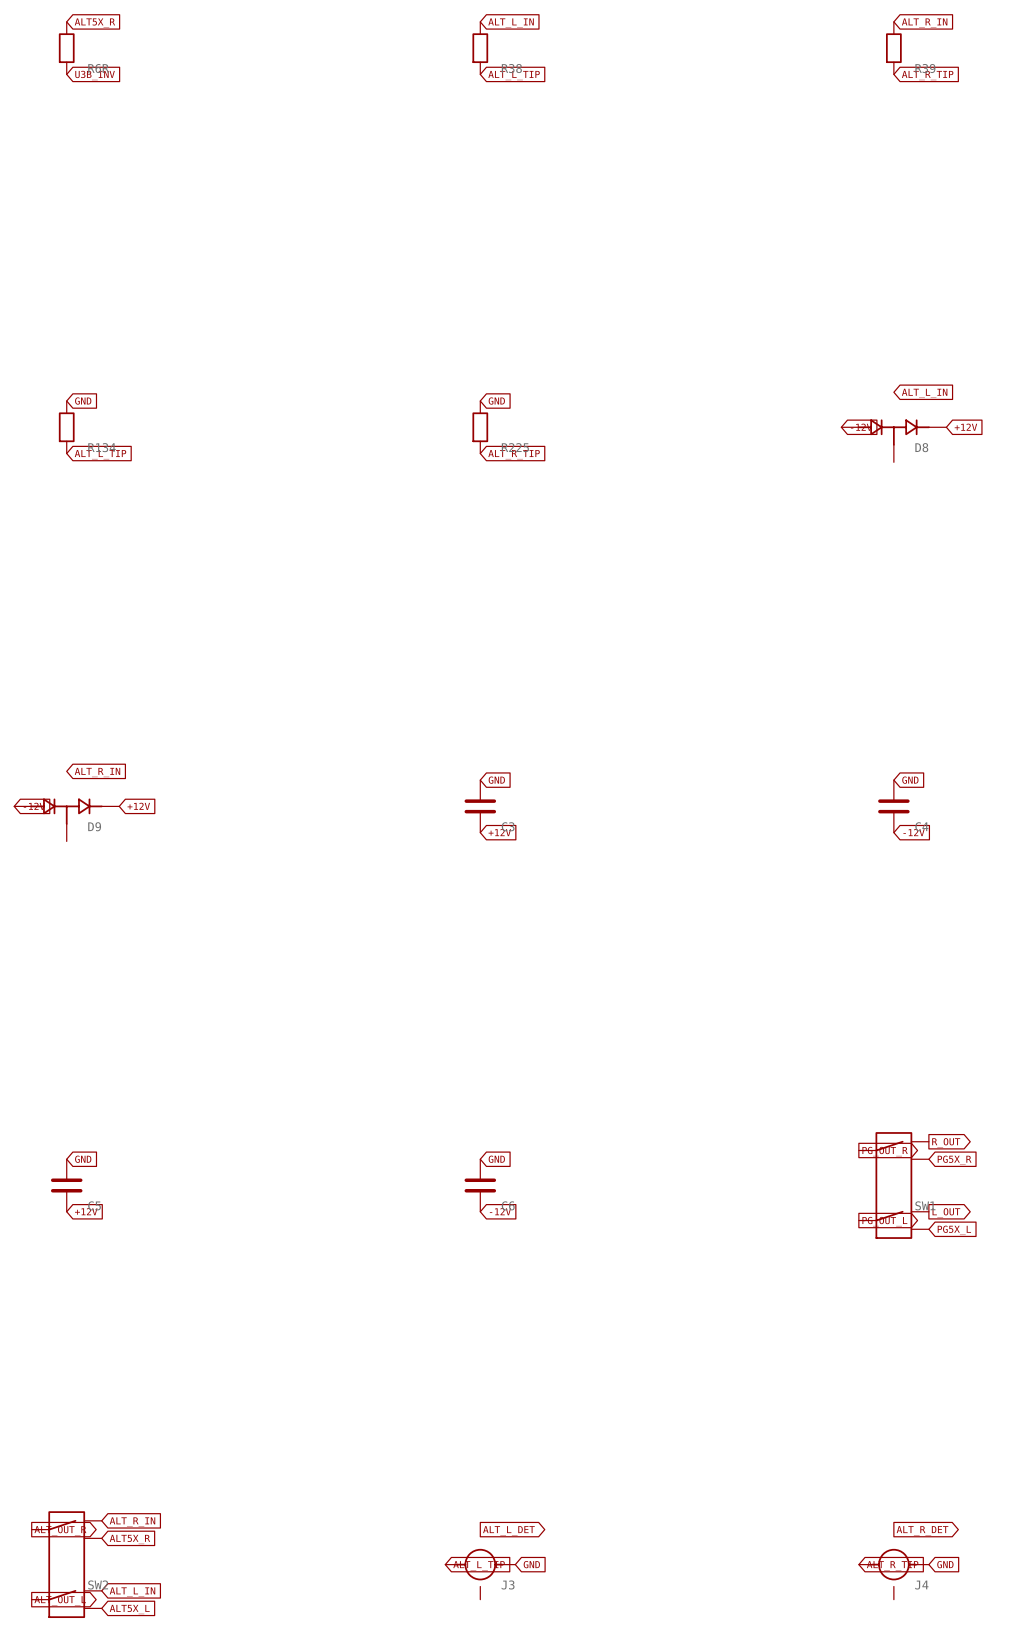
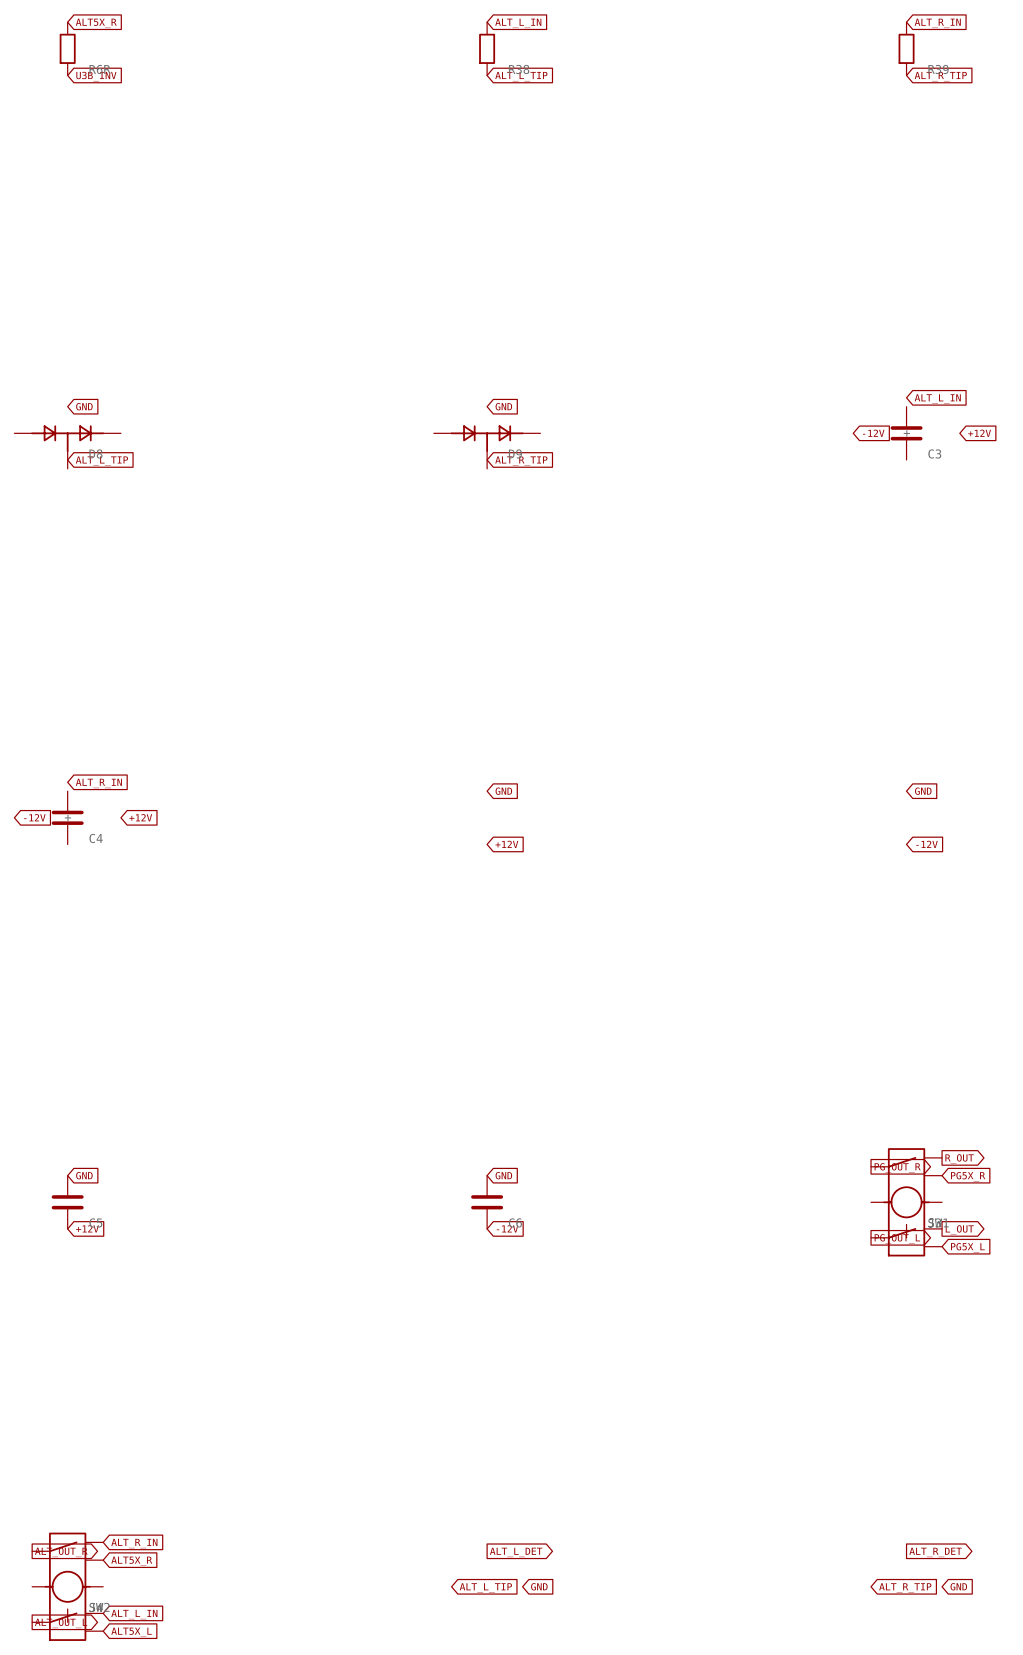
D8 symbol: [841, 419, 947, 463] -> [14, 425, 121, 469]
R134: (66, 427) -> none
R225: (480, 427) -> none
C3 pin name: none -> + (906, 433)
D9 symbol: [14, 798, 120, 842] -> [433, 425, 541, 469]
C4 pin name: none -> + (67, 817)
C3 position: (480, 806) -> (906, 433)
C4 position: (893, 806) -> (67, 817)
J3 position: (480, 1574) -> (906, 1212)
J4 position: (893, 1574) -> (67, 1596)

